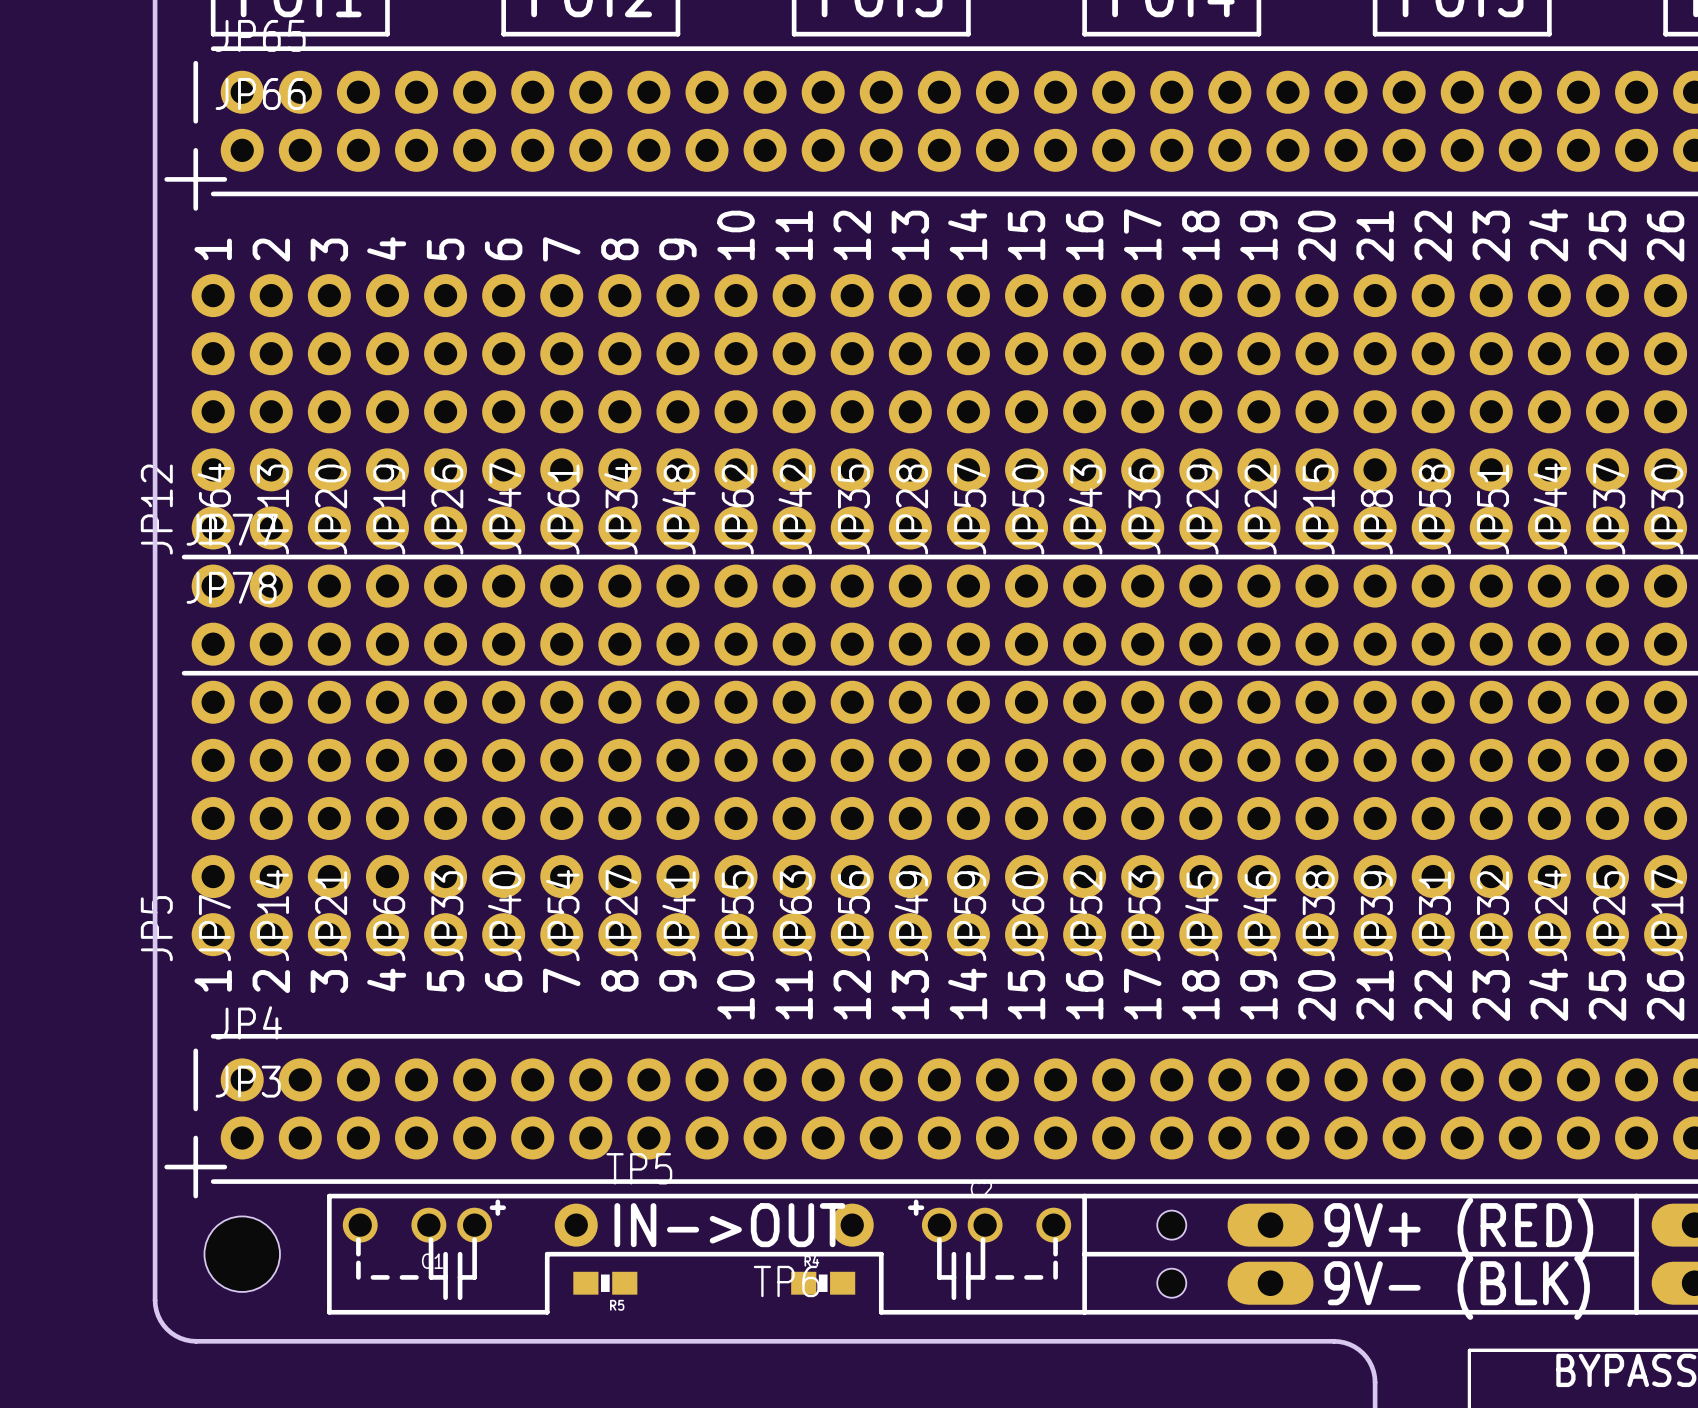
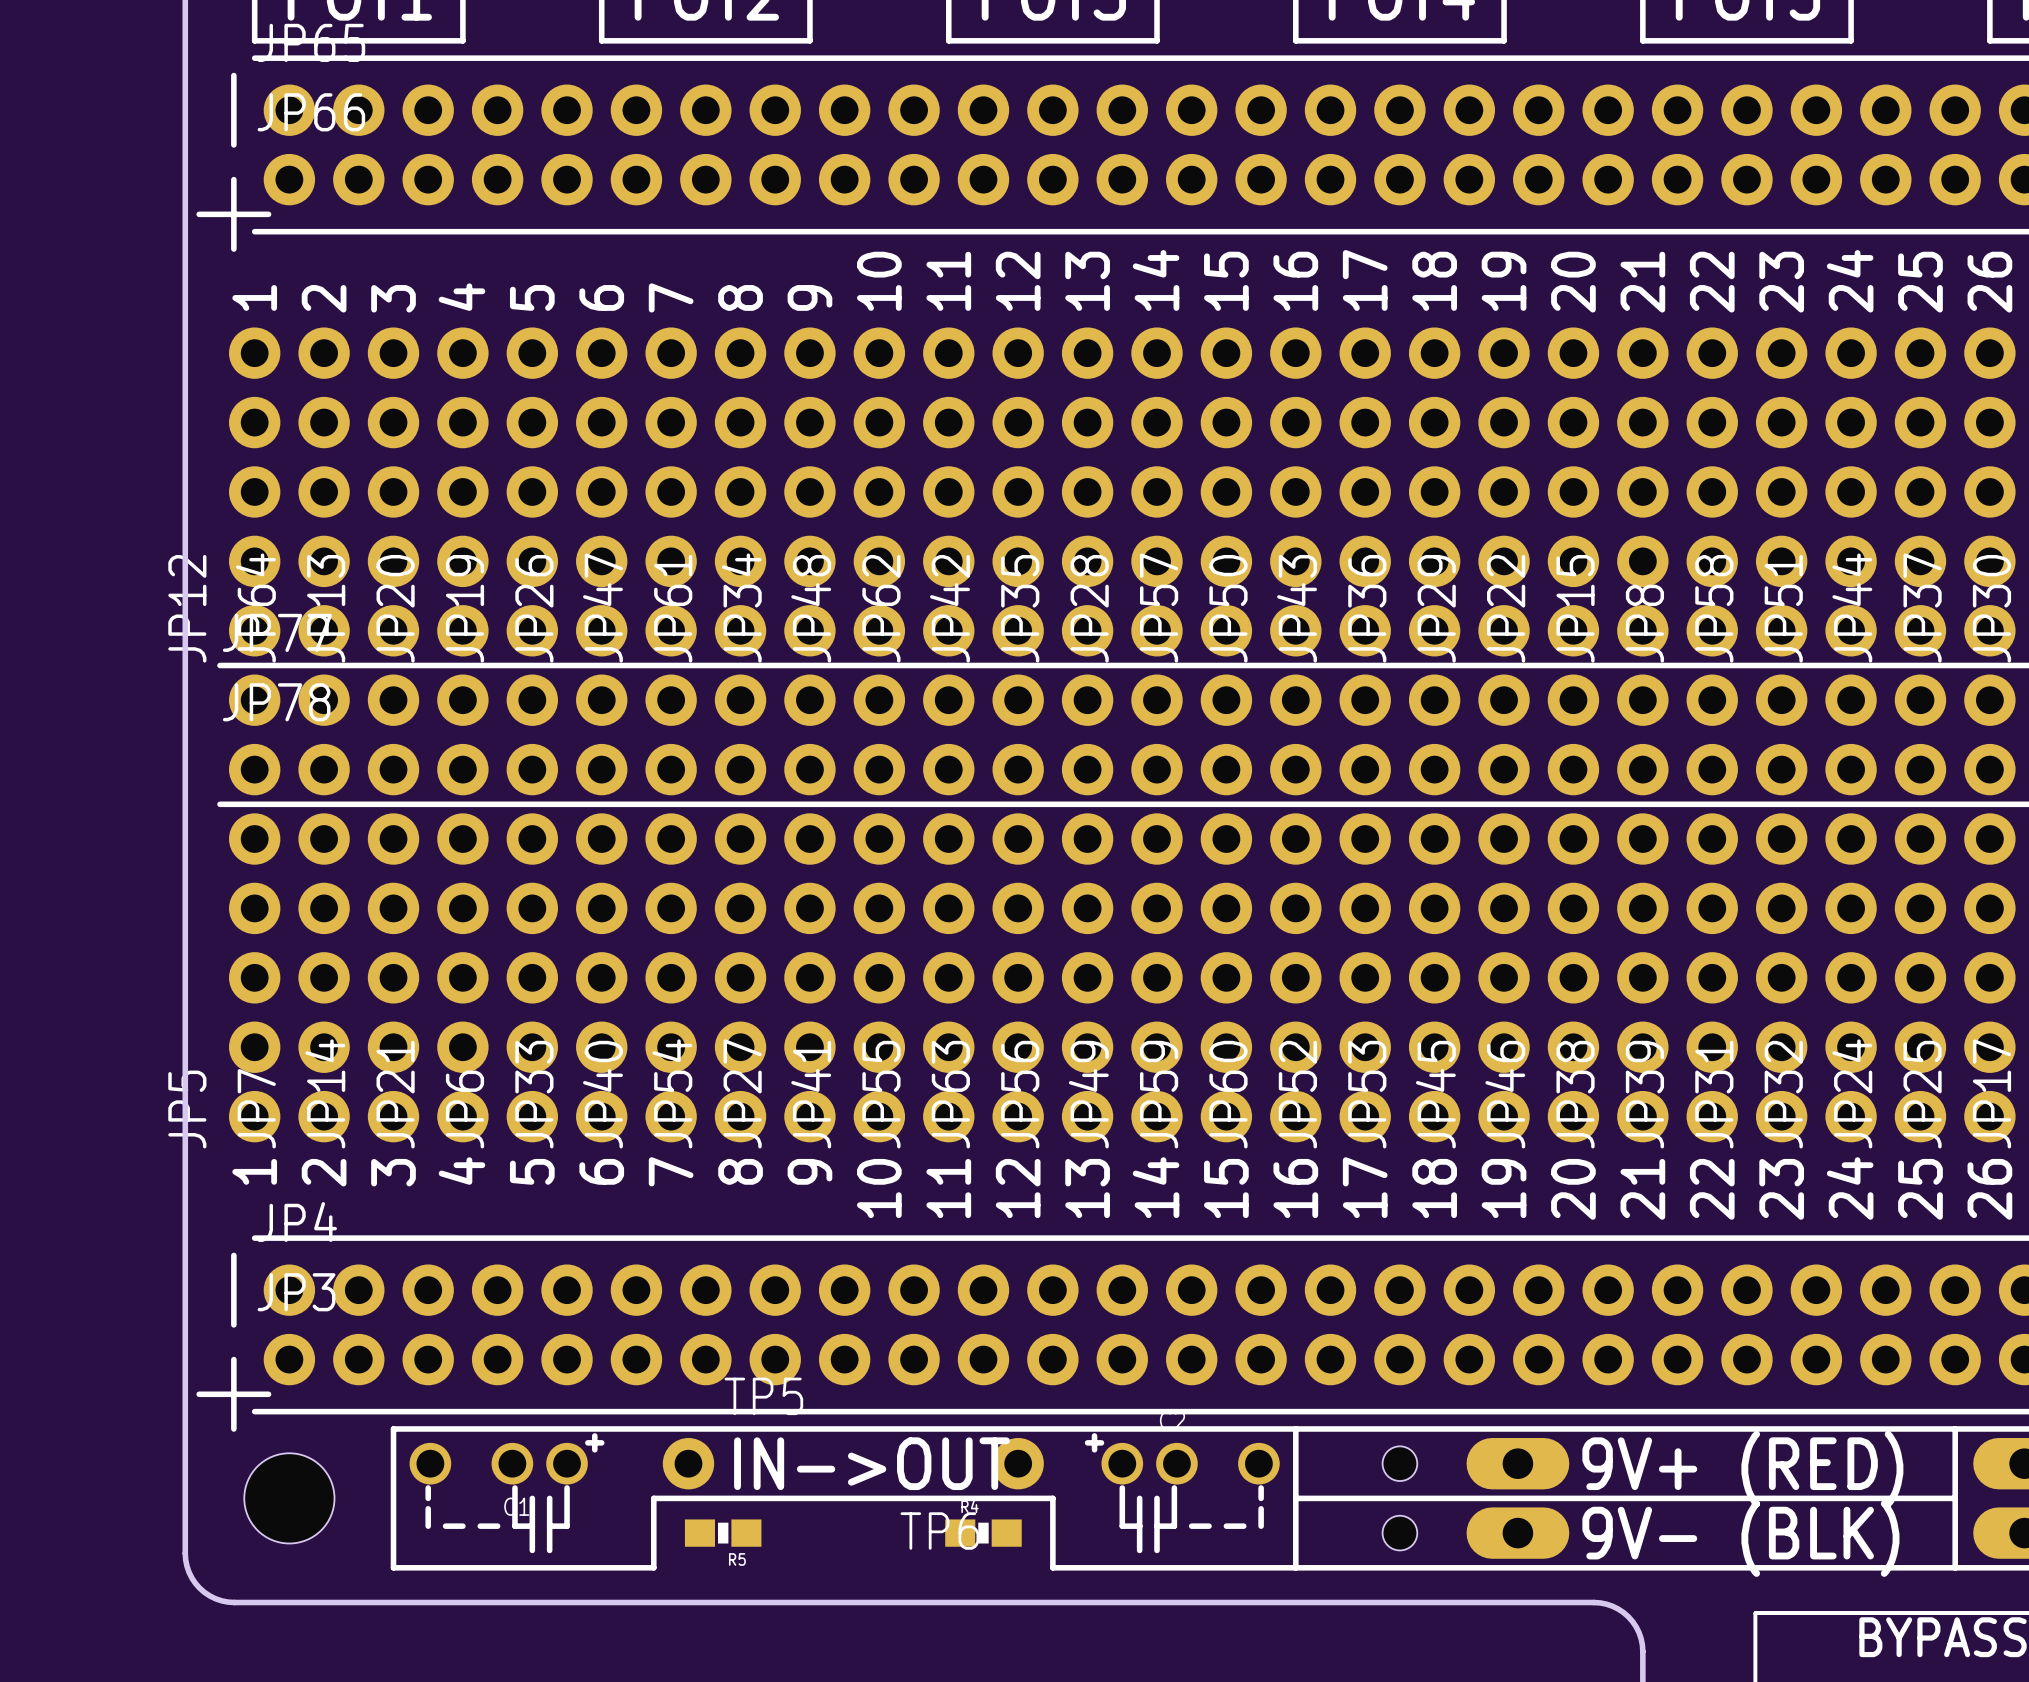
line: (358, 1239) (358, 1245) -> none
line: (431, 1239) (431, 1245) -> none
line: (474, 1239) (474, 1245) -> none
line: (939, 1239) (939, 1245) -> none
line: (982, 1239) (982, 1245) -> none
line: (1055, 1239) (1055, 1245) -> none

